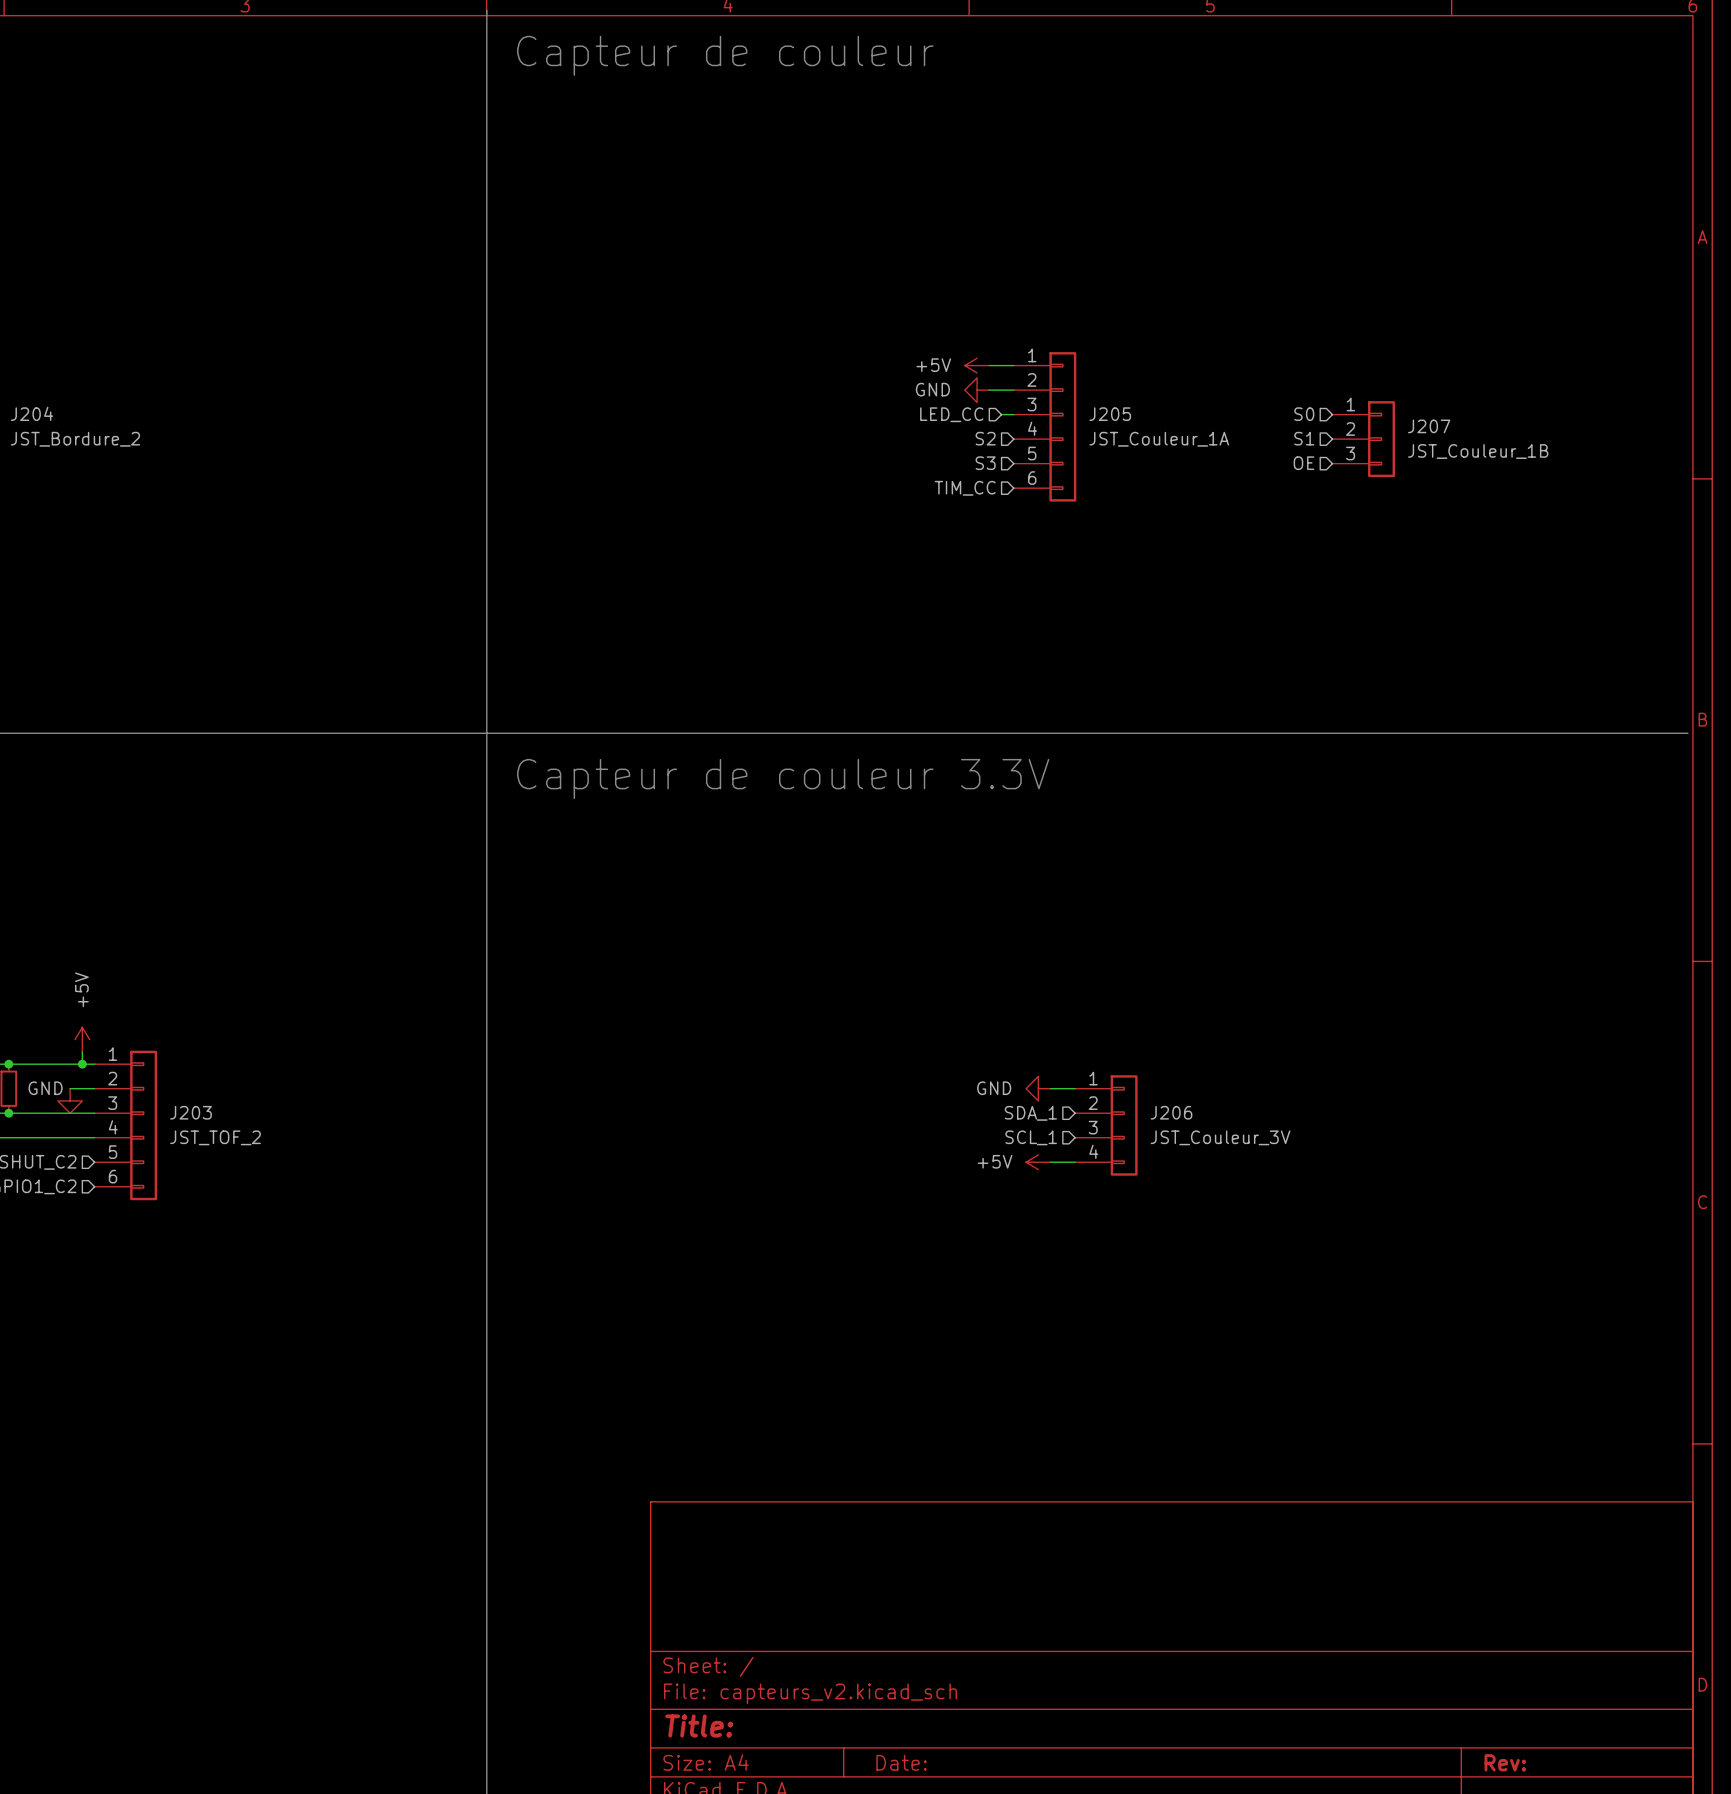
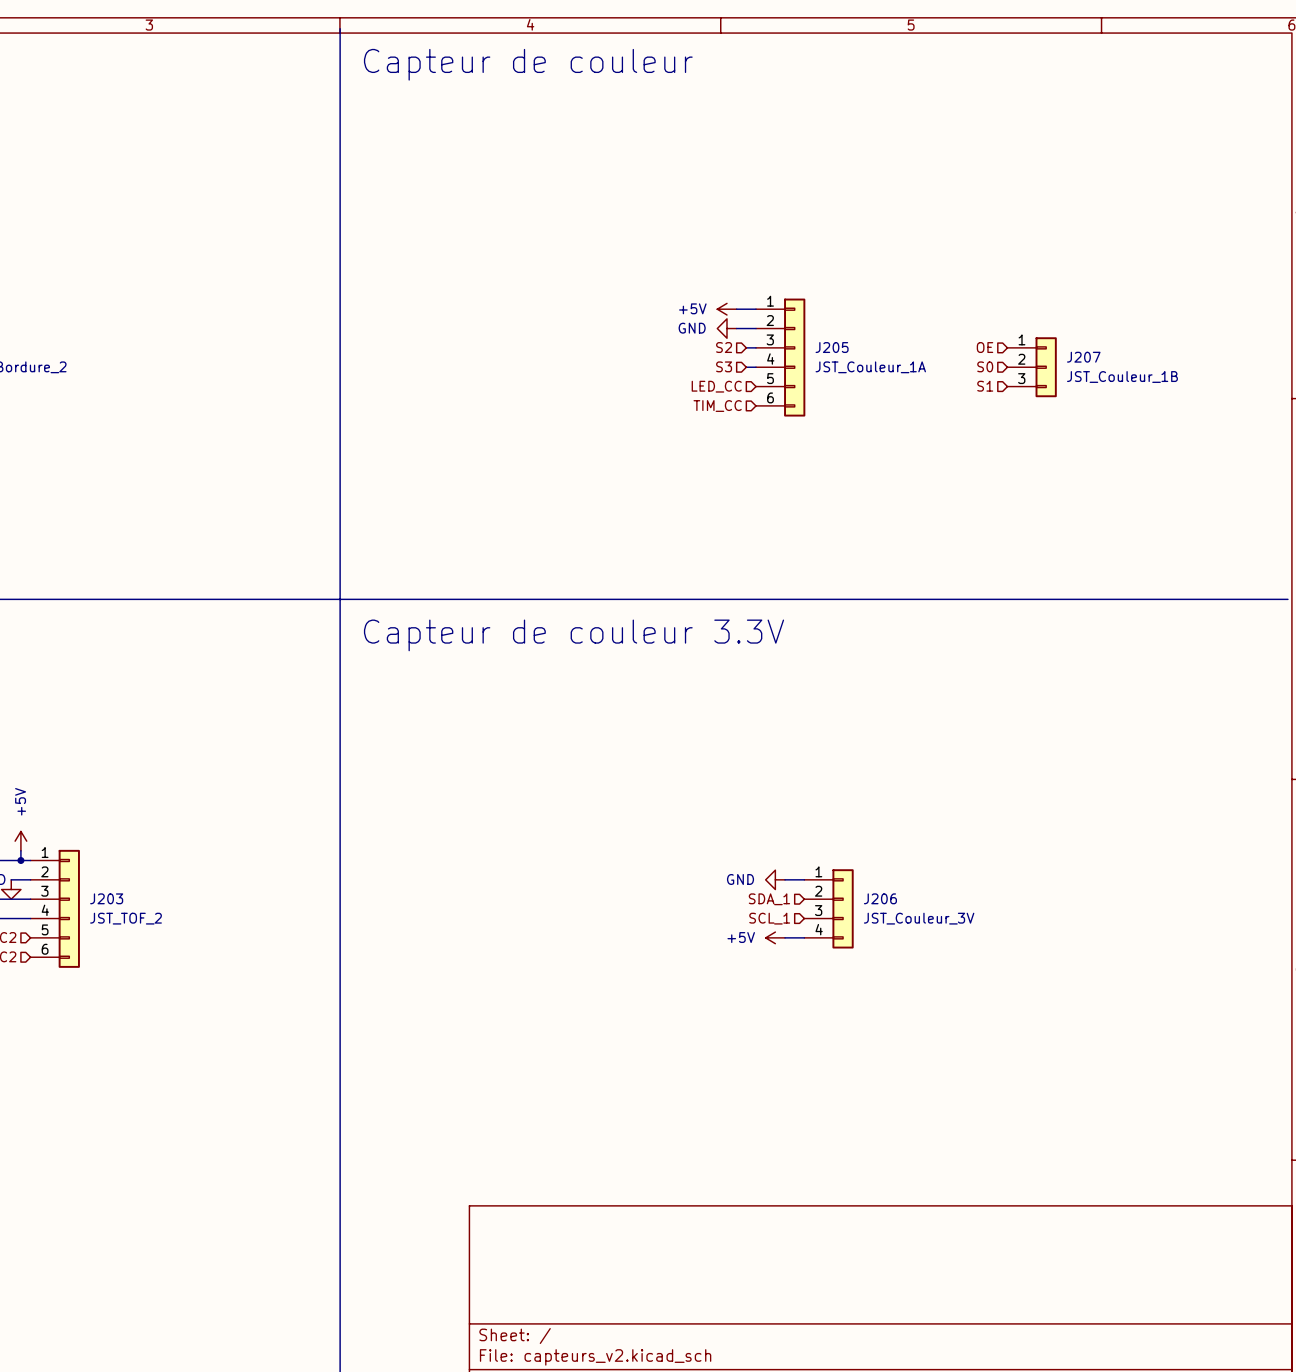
hierarchical label: LED_CC (951, 414) -> S2 (724, 347)
hierarchical label: S0 (1304, 414) -> OE (984, 347)
hierarchical label: none -> S3 (724, 366)
hierarchical label: S2 (985, 438) -> none
hierarchical label: S1 (1304, 438) -> S0 (985, 366)
wire: none -> (746, 367) (756, 367)
hierarchical label: S3 (985, 463) -> LED_CC (716, 386)
hierarchical label: OE (1303, 463) -> S1 (985, 386)

